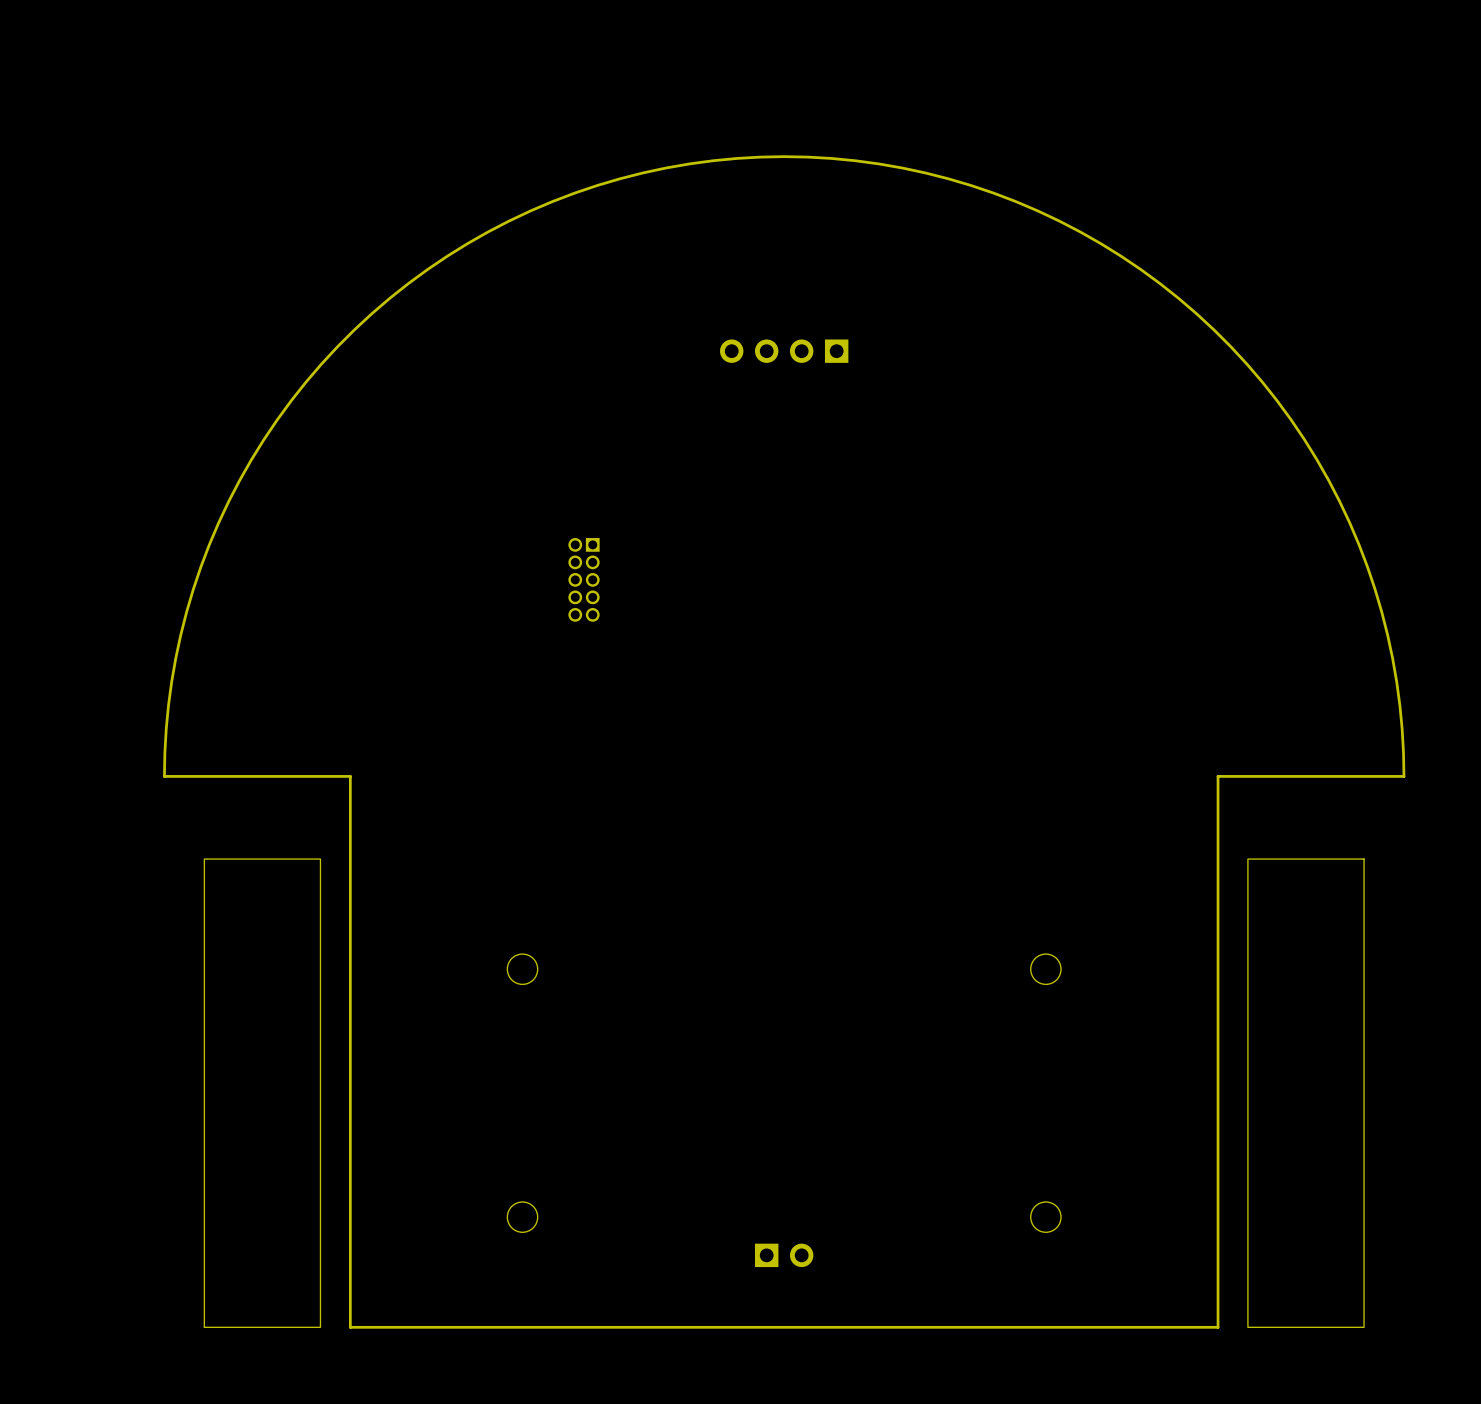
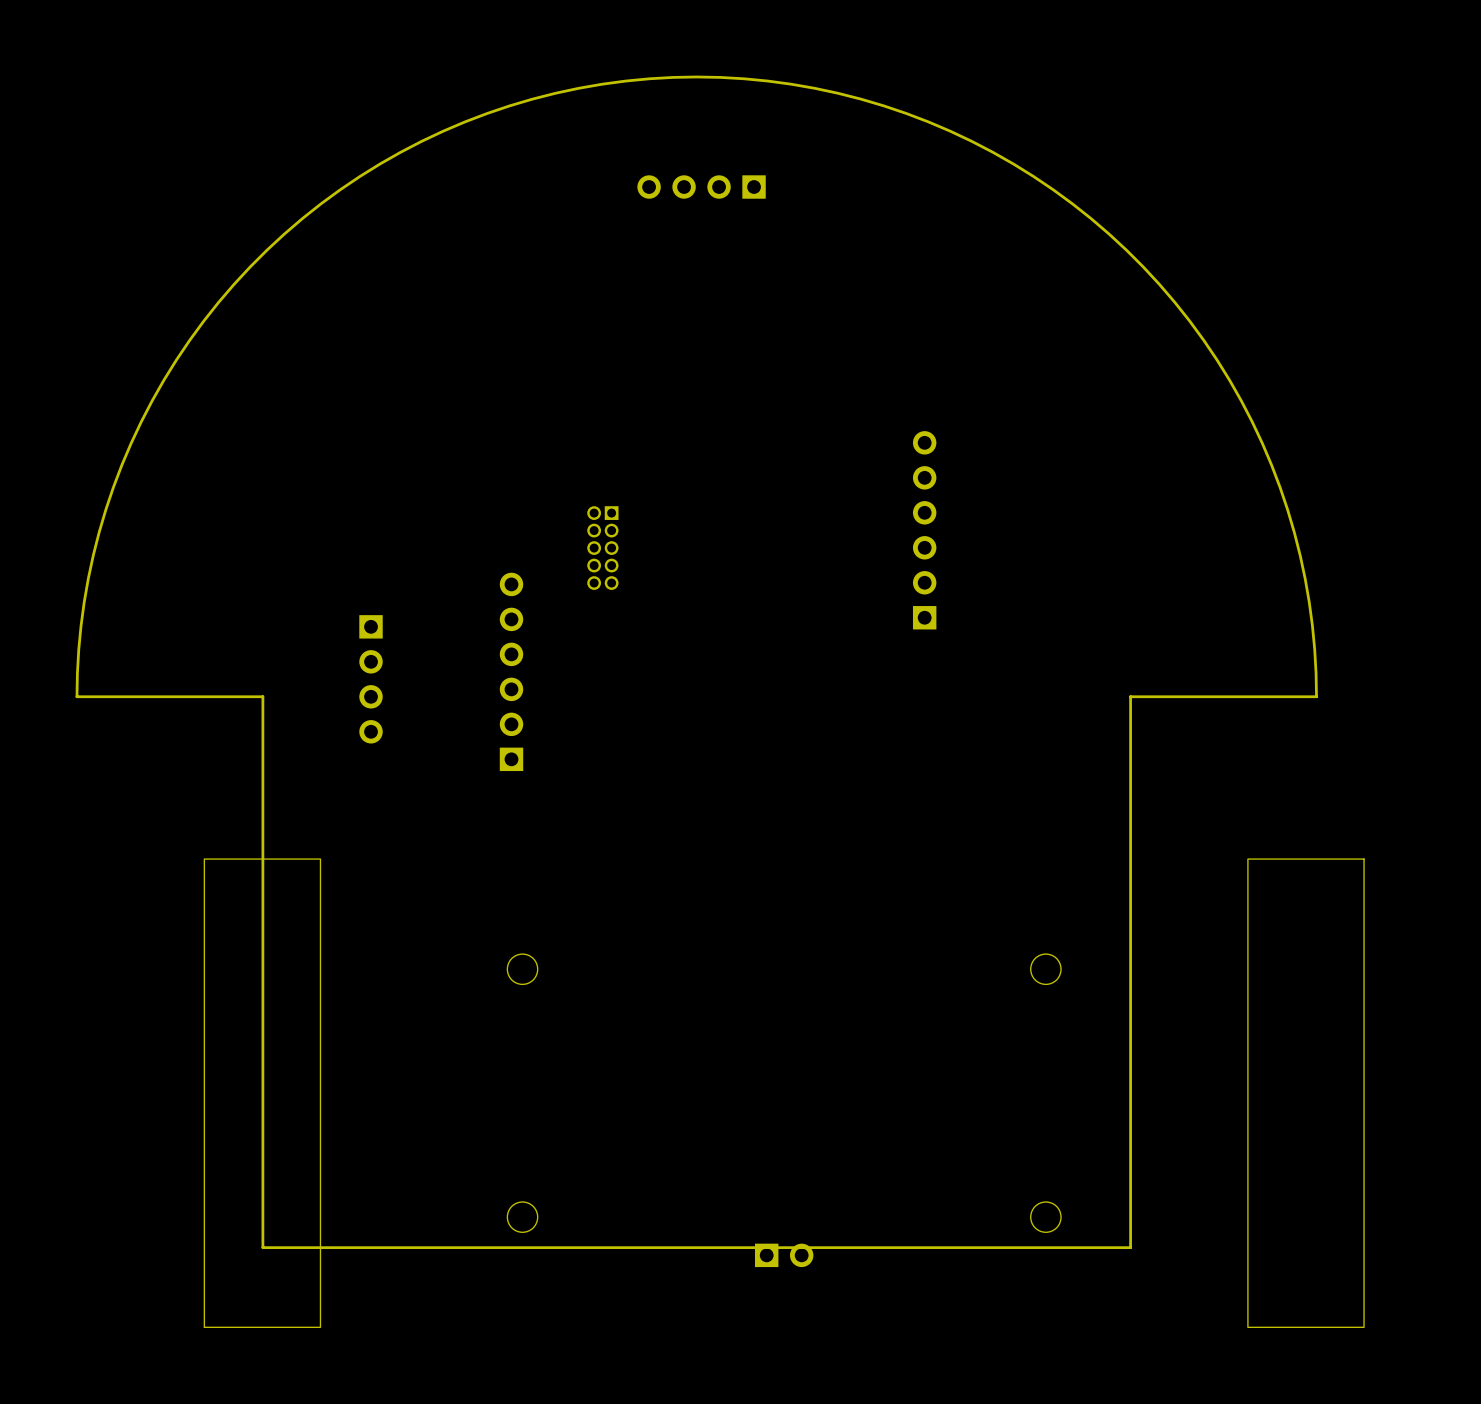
part position: (784, 351) -> (701, 187)
part: none -> (924, 530)
part position: (584, 579) -> (602, 548)
part: none -> (511, 671)
part: none -> (371, 679)
board edge: (1403, 776) (1218, 776) (1218, 1327) (350, 1327) (350, 776) (164, 776) (168, 705) (175, 658) (186, 612) (209, 544) (228, 501) (263, 439) (291, 400) (337, 346) (389, 298) (447, 256) (488, 231) (552, 201) (619, 178) (666, 167) (713, 160) (784, 156) (831, 158) (902, 167) (948, 178) (1015, 201) (1080, 231) (1121, 256) (1178, 298) (1213, 329) (1262, 382) (1291, 419) (1316, 459) (1349, 522) (1367, 566) (1387, 635) (1399, 705) (1403, 776) -> (1316, 696) (1130, 696) (1130, 1247) (262, 1247) (262, 696) (76, 696) (81, 625) (93, 555) (105, 509) (131, 443) (164, 380) (189, 340) (218, 302) (266, 250) (302, 218) (359, 176) (421, 141) (465, 121) (509, 105) (578, 88) (625, 81) (696, 76) (767, 81) (814, 88) (860, 99) (928, 121) (971, 141) (1033, 176) (1072, 203) (1126, 250) (1174, 302) (1203, 340) (1241, 400) (1271, 465) (1287, 509) (1305, 578) (1312, 625) (1316, 696)

